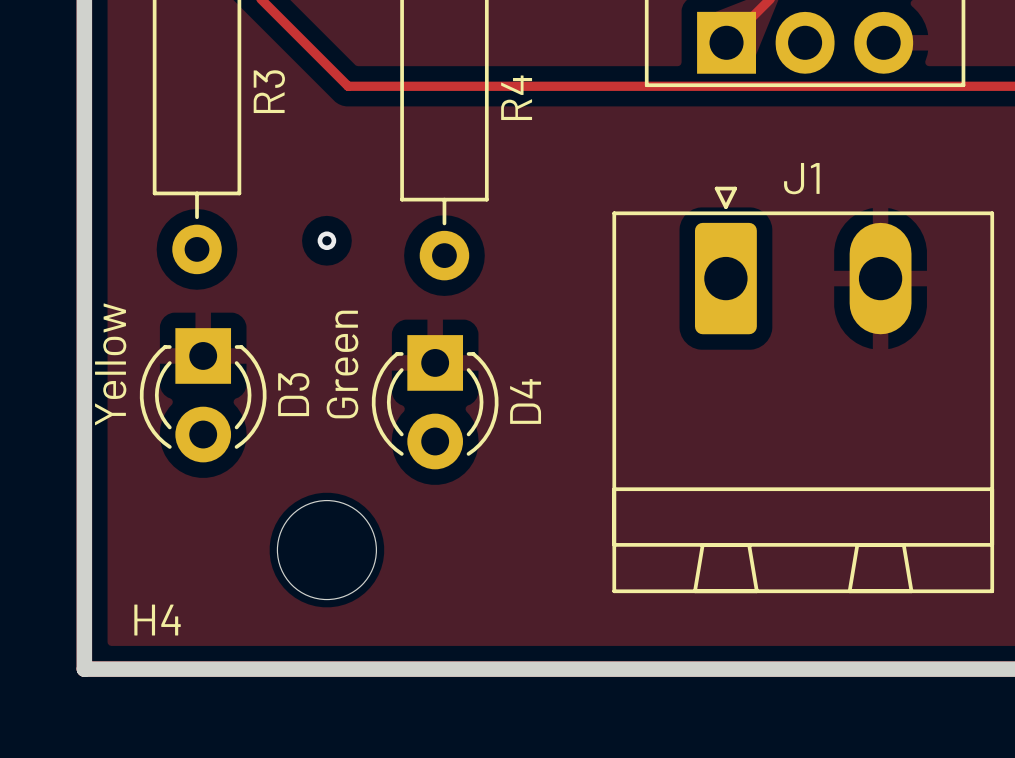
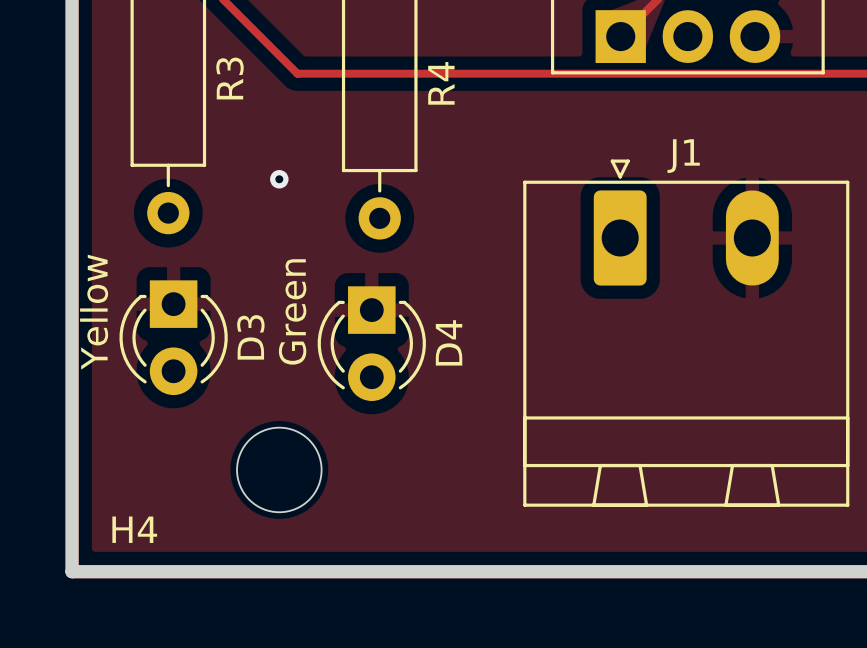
via: none -> (279, 179)
via: (326, 240) -> none

